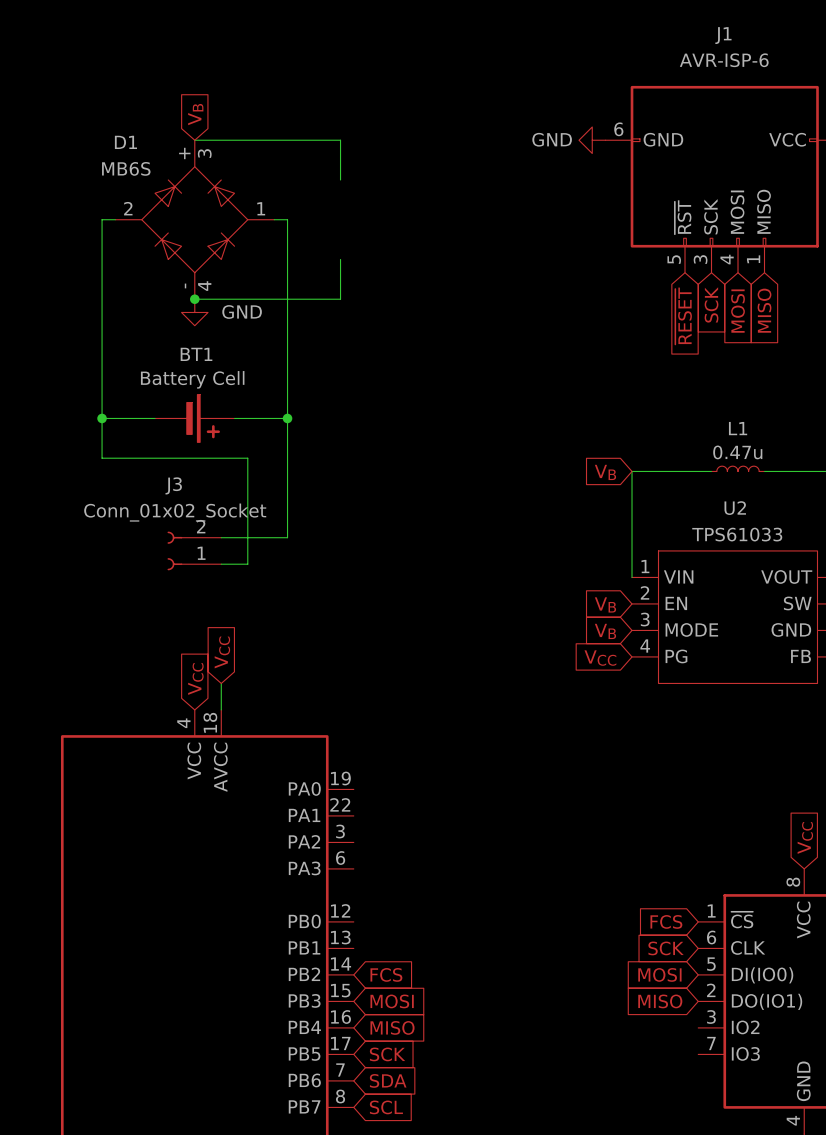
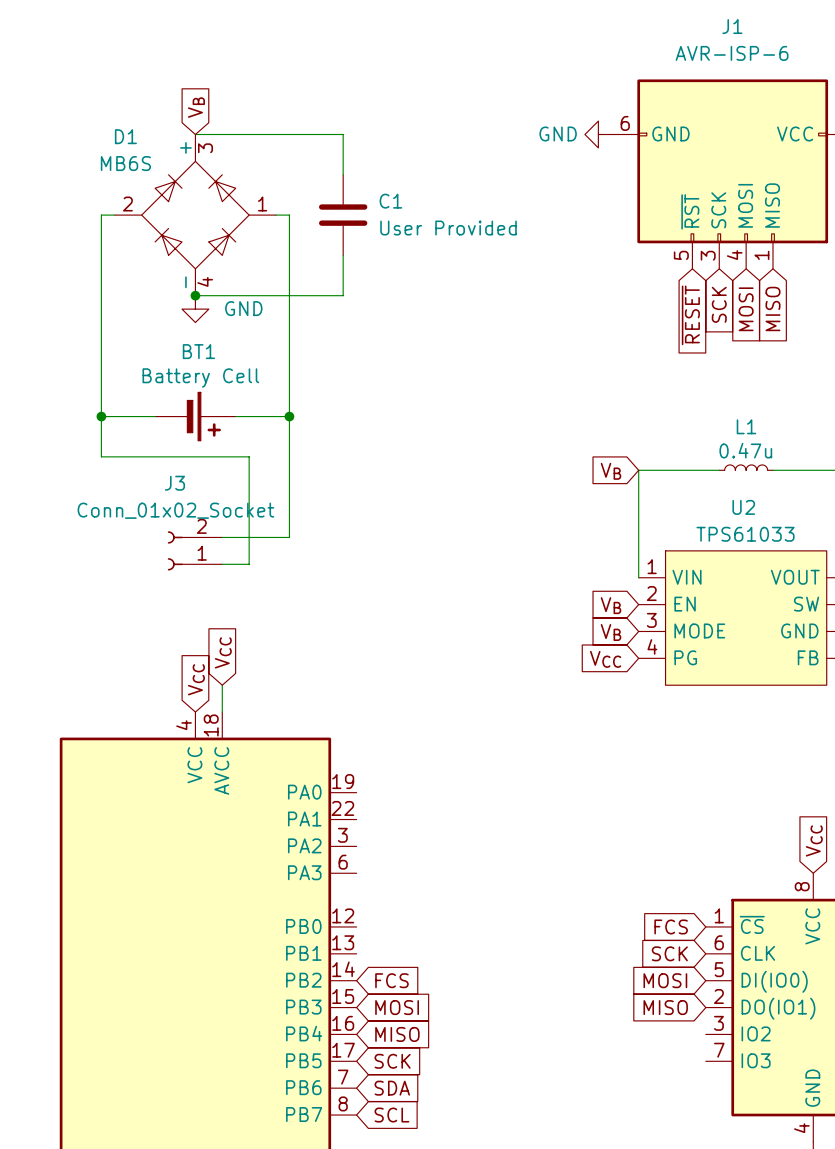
C1: none -> User Provided (343, 215)

